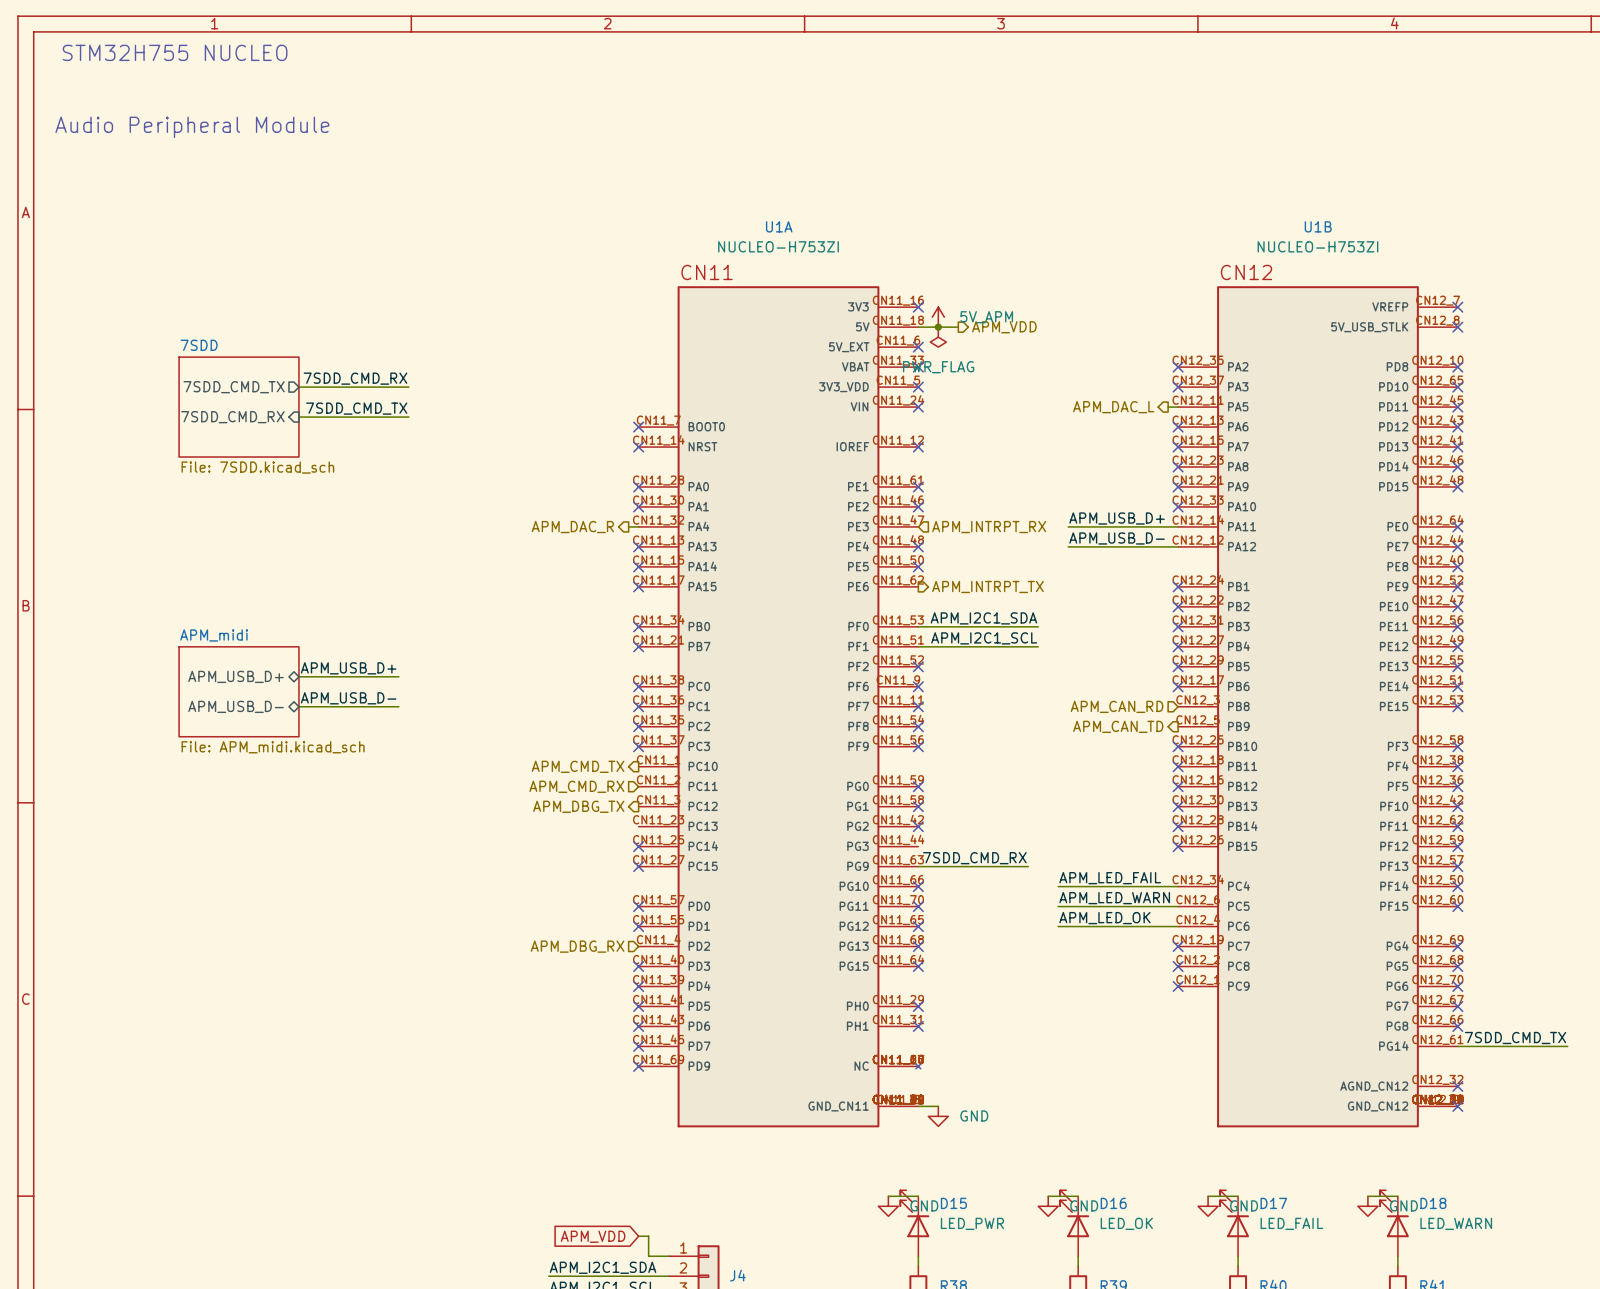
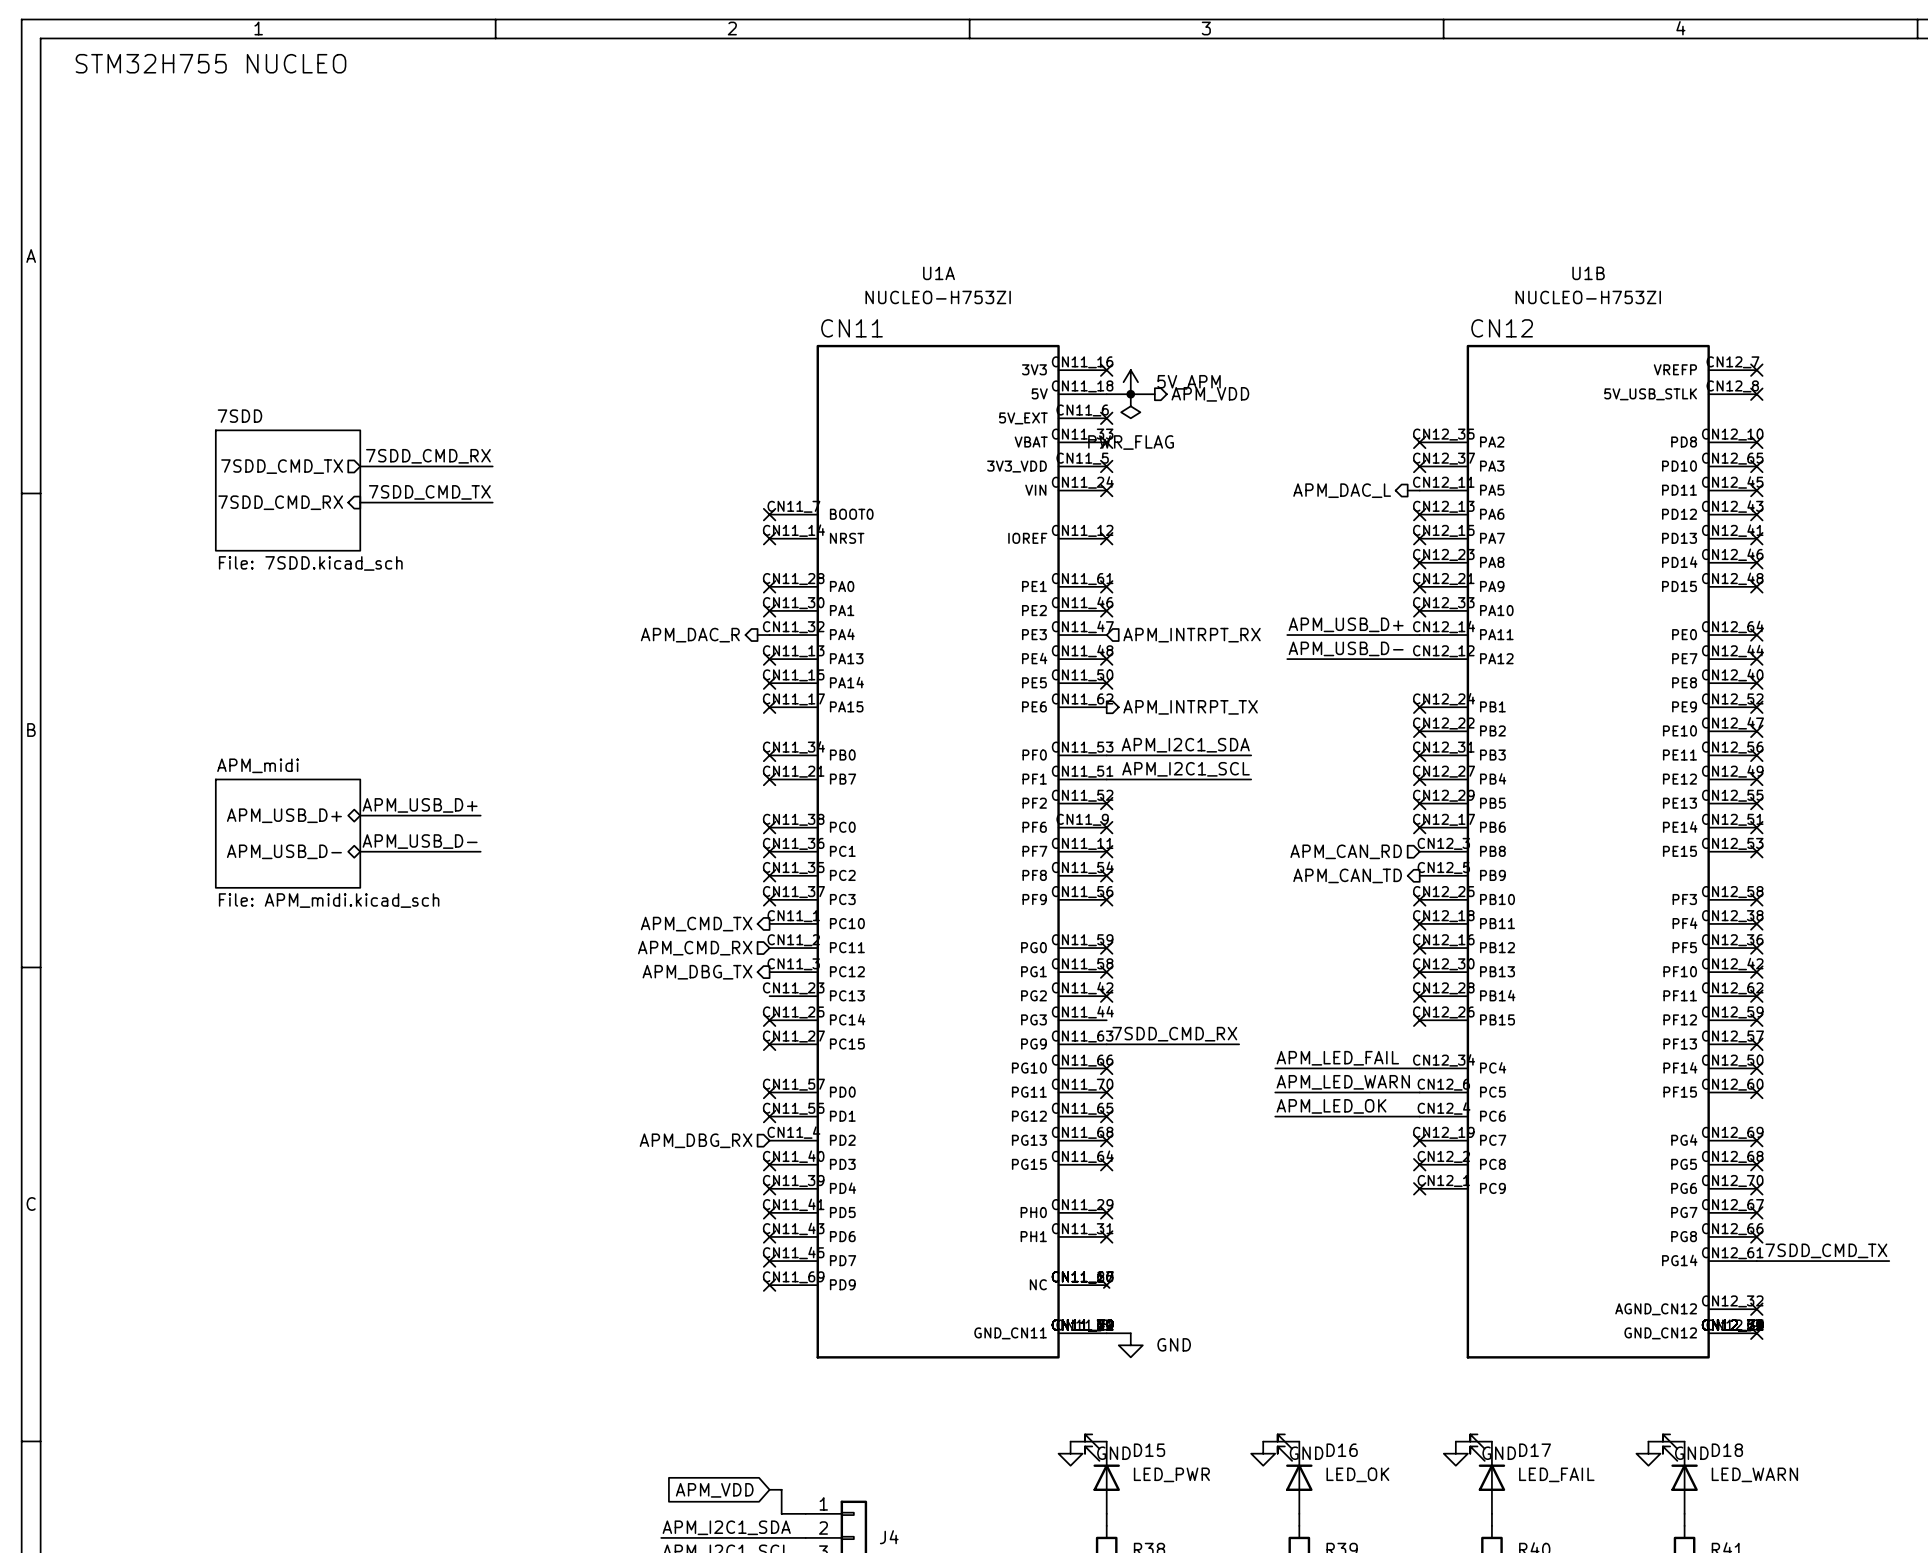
text: Audio Peripheral Module (192, 127) -> none

